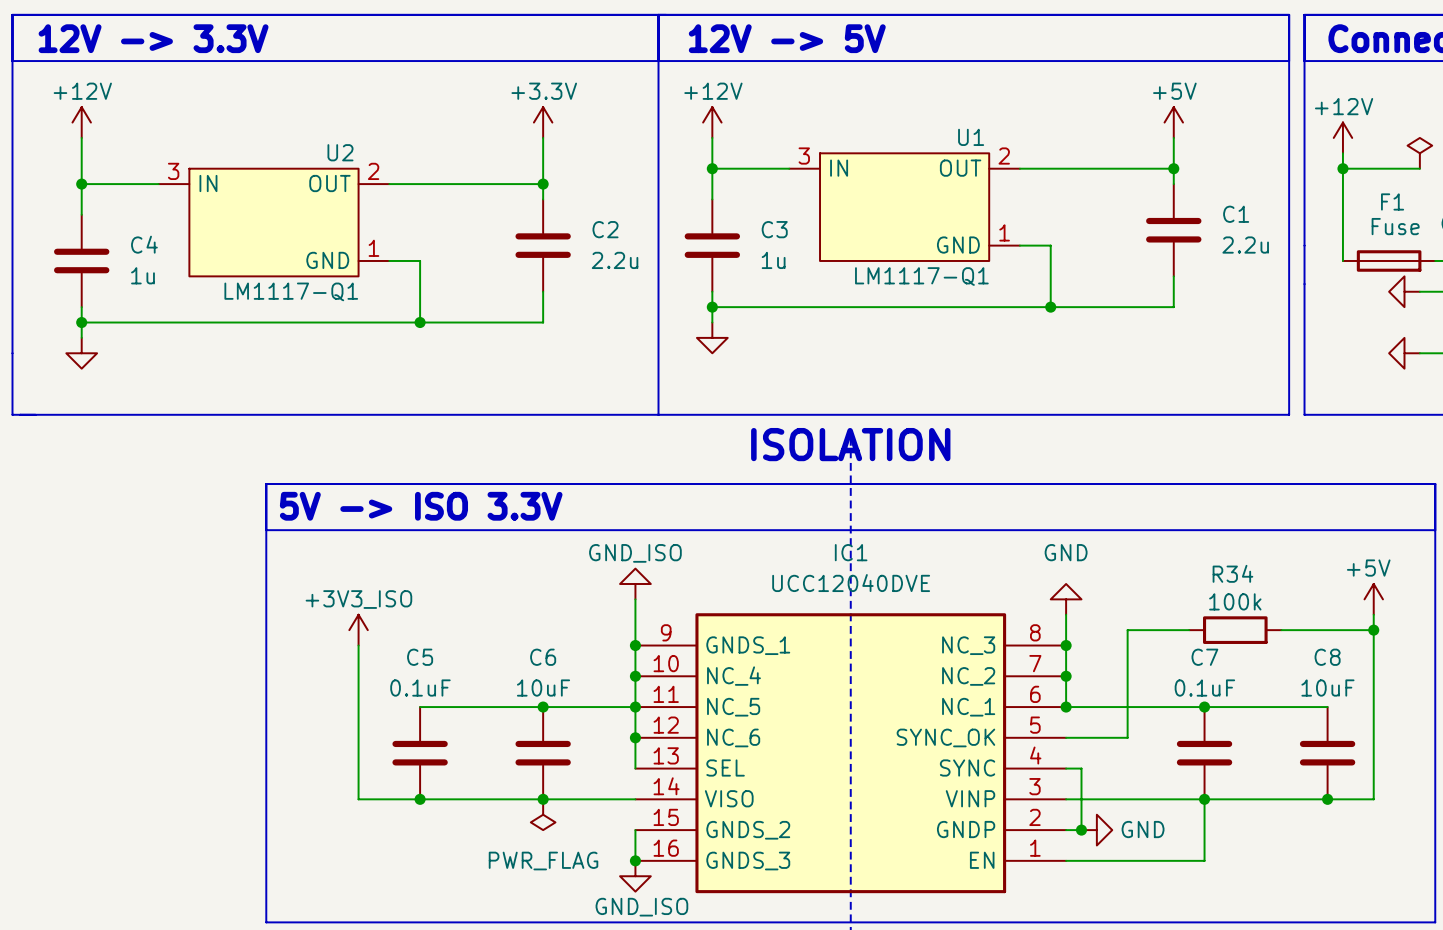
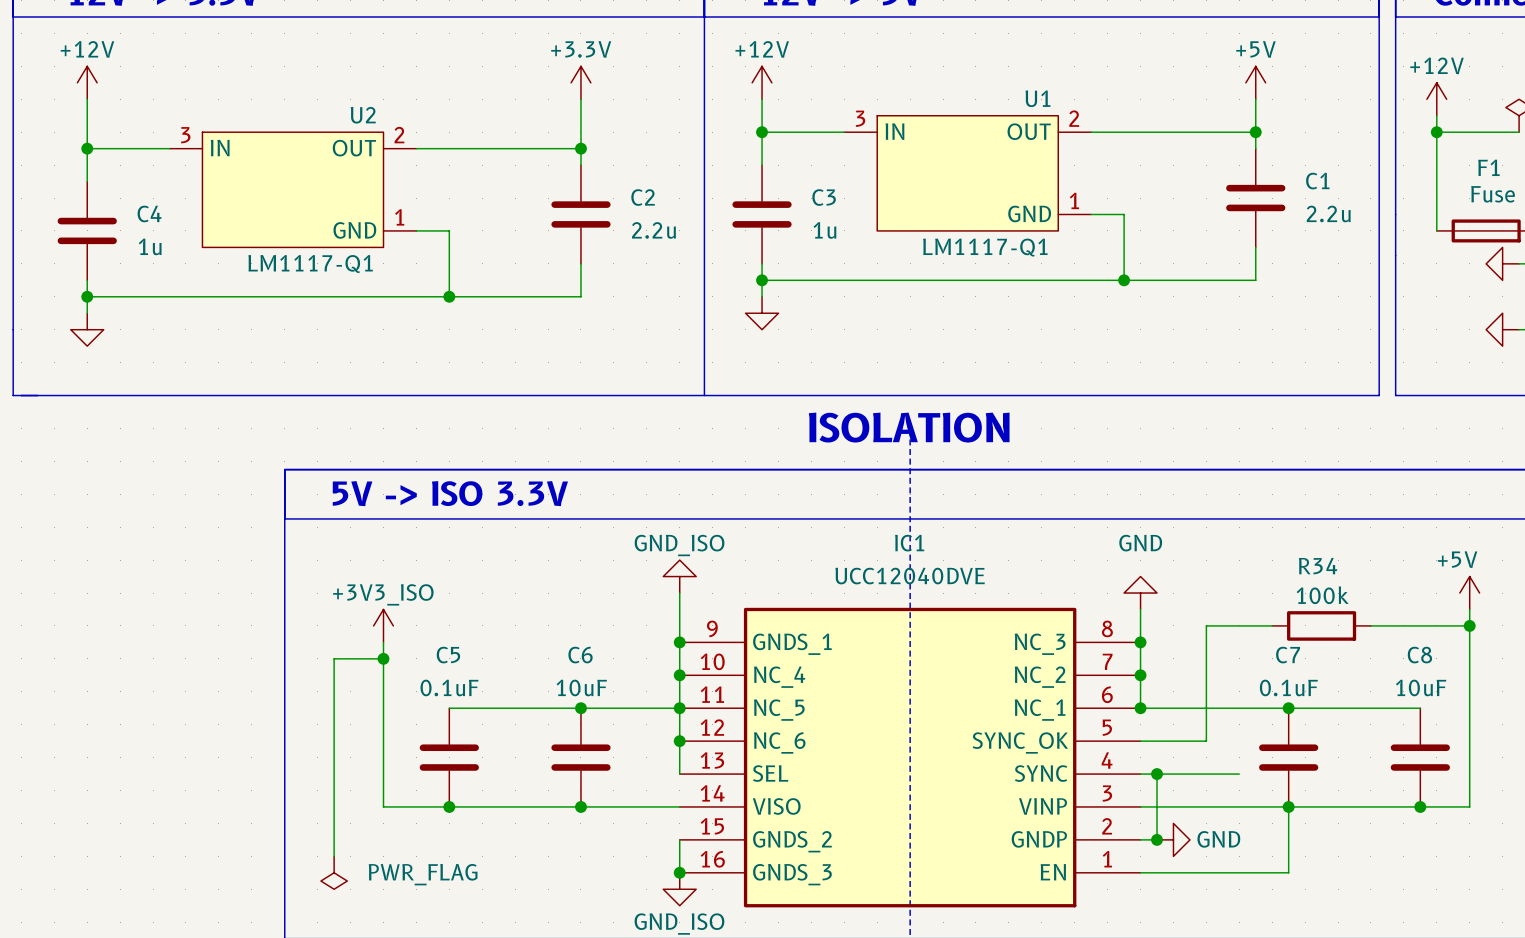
wire: none -> (383, 658) (334, 658) (334, 856)
junction: none -> (383, 658)
wire: none -> (1157, 774) (1239, 774)
junction: none -> (1157, 774)
power symbol position: PWR_FLAG (543, 814) -> PWR_FLAG (334, 872)
power symbol text position: PWR_FLAG (543, 861) -> PWR_FLAG (423, 874)

